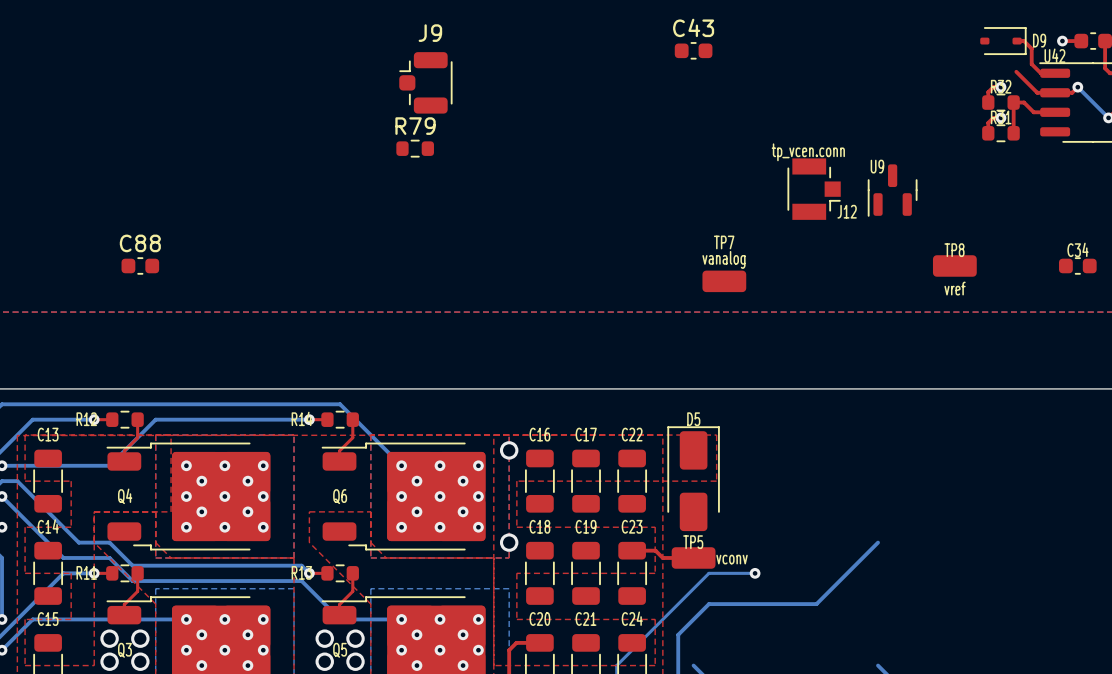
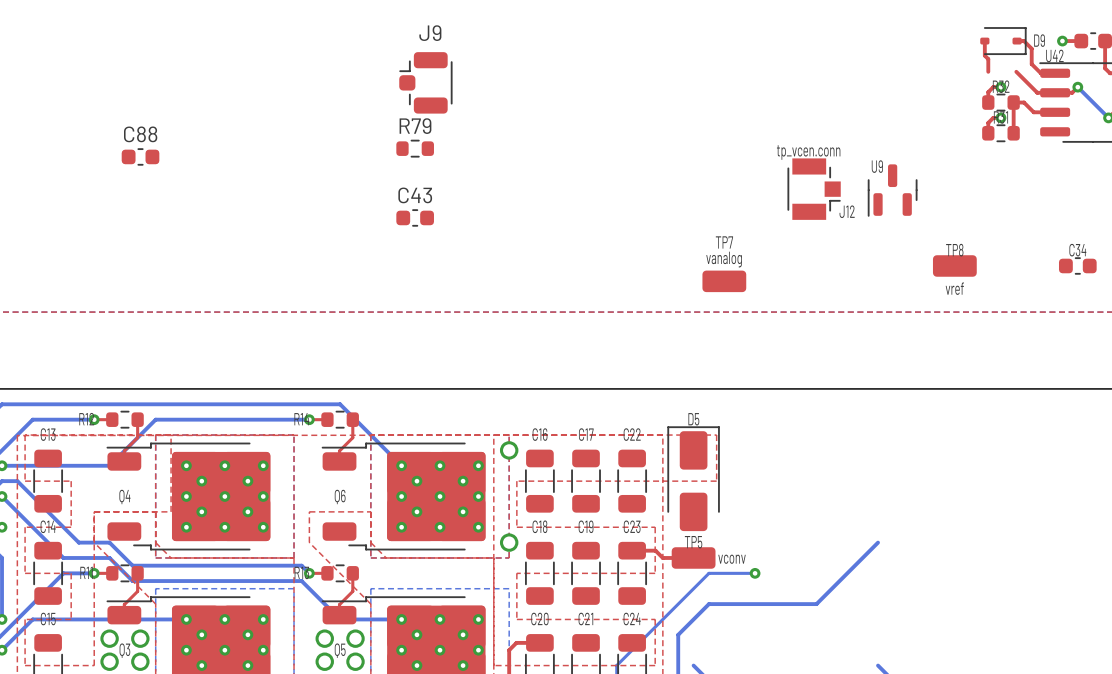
top track: none -> (984, 41) (984, 55) (988, 59) (988, 71)
C43 position: (693, 50) -> (415, 217)
C88 position: (140, 265) -> (140, 156)

